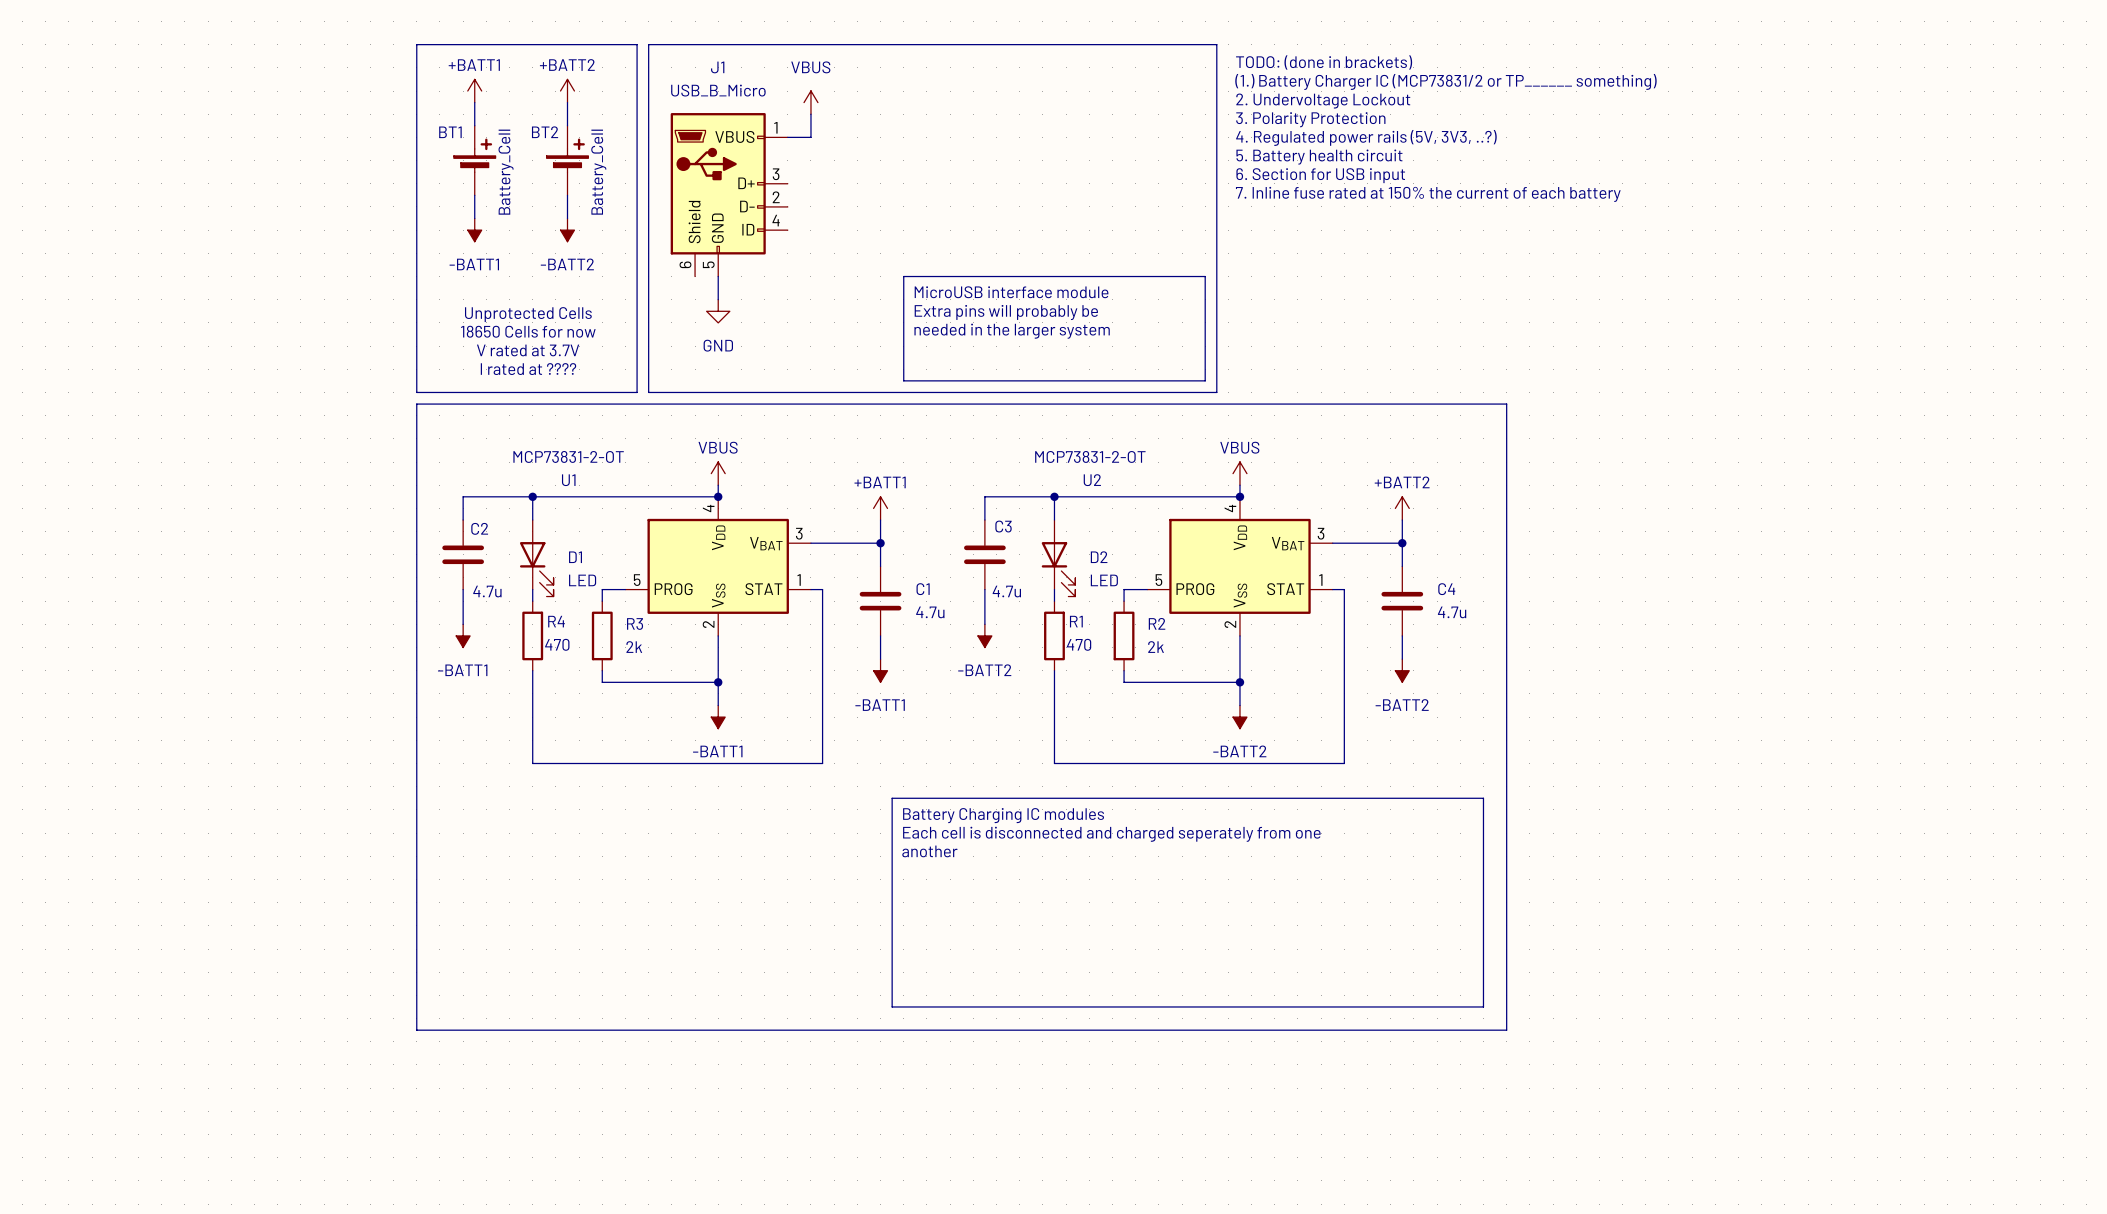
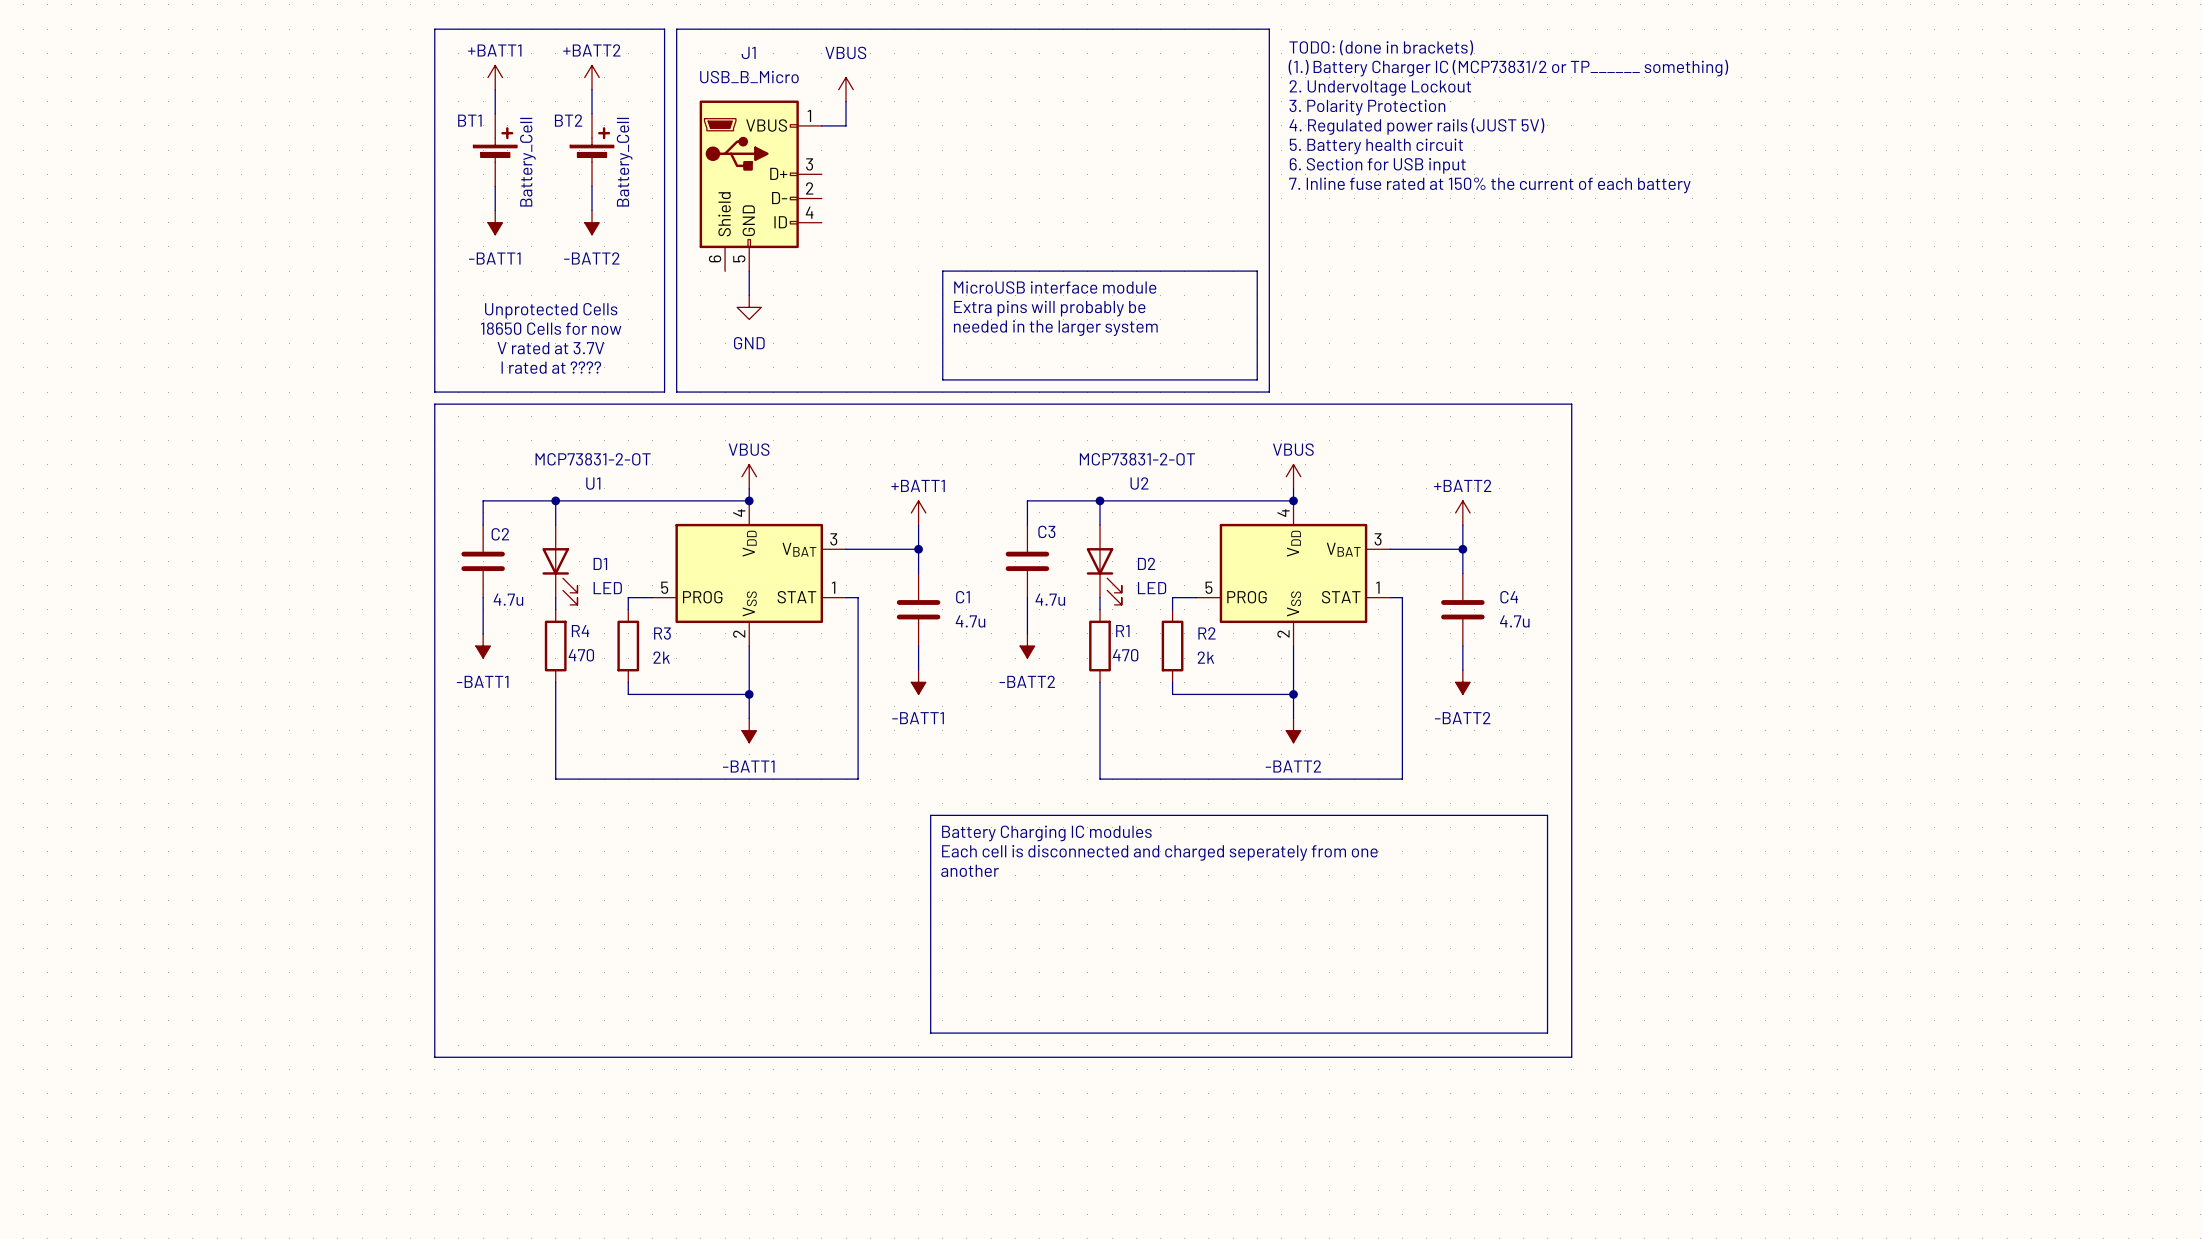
text: 4. Regulated power rails (5V, 3V3, ..?) (1366, 137) -> 4. Regulated power rails (JUST 5V) (1416, 126)

